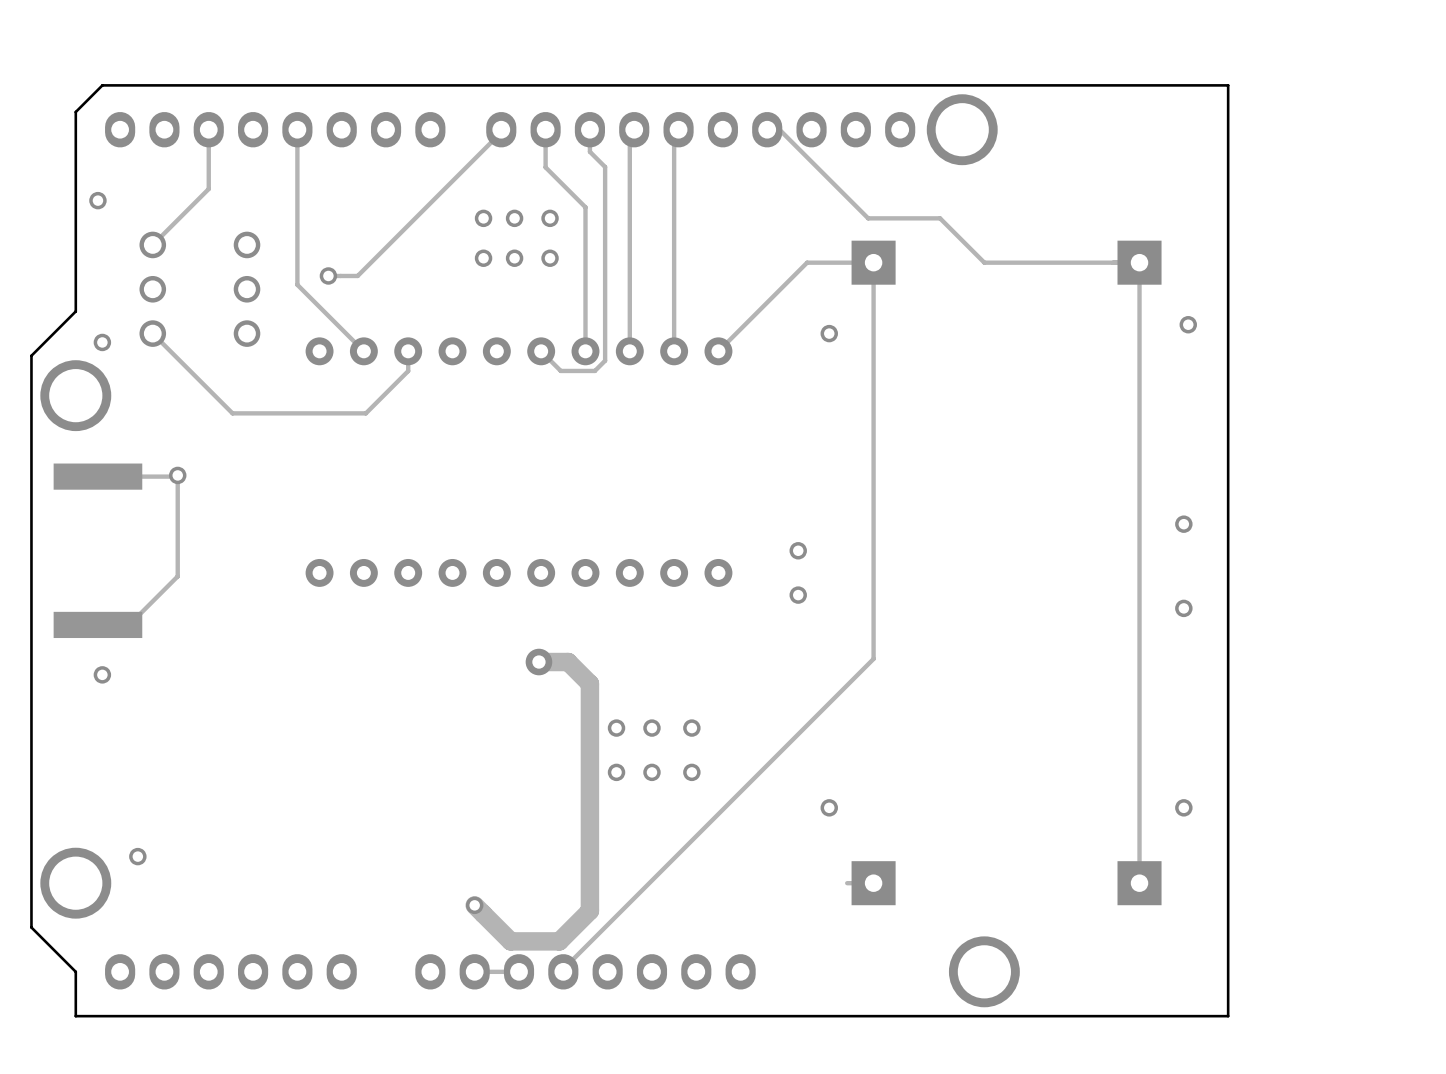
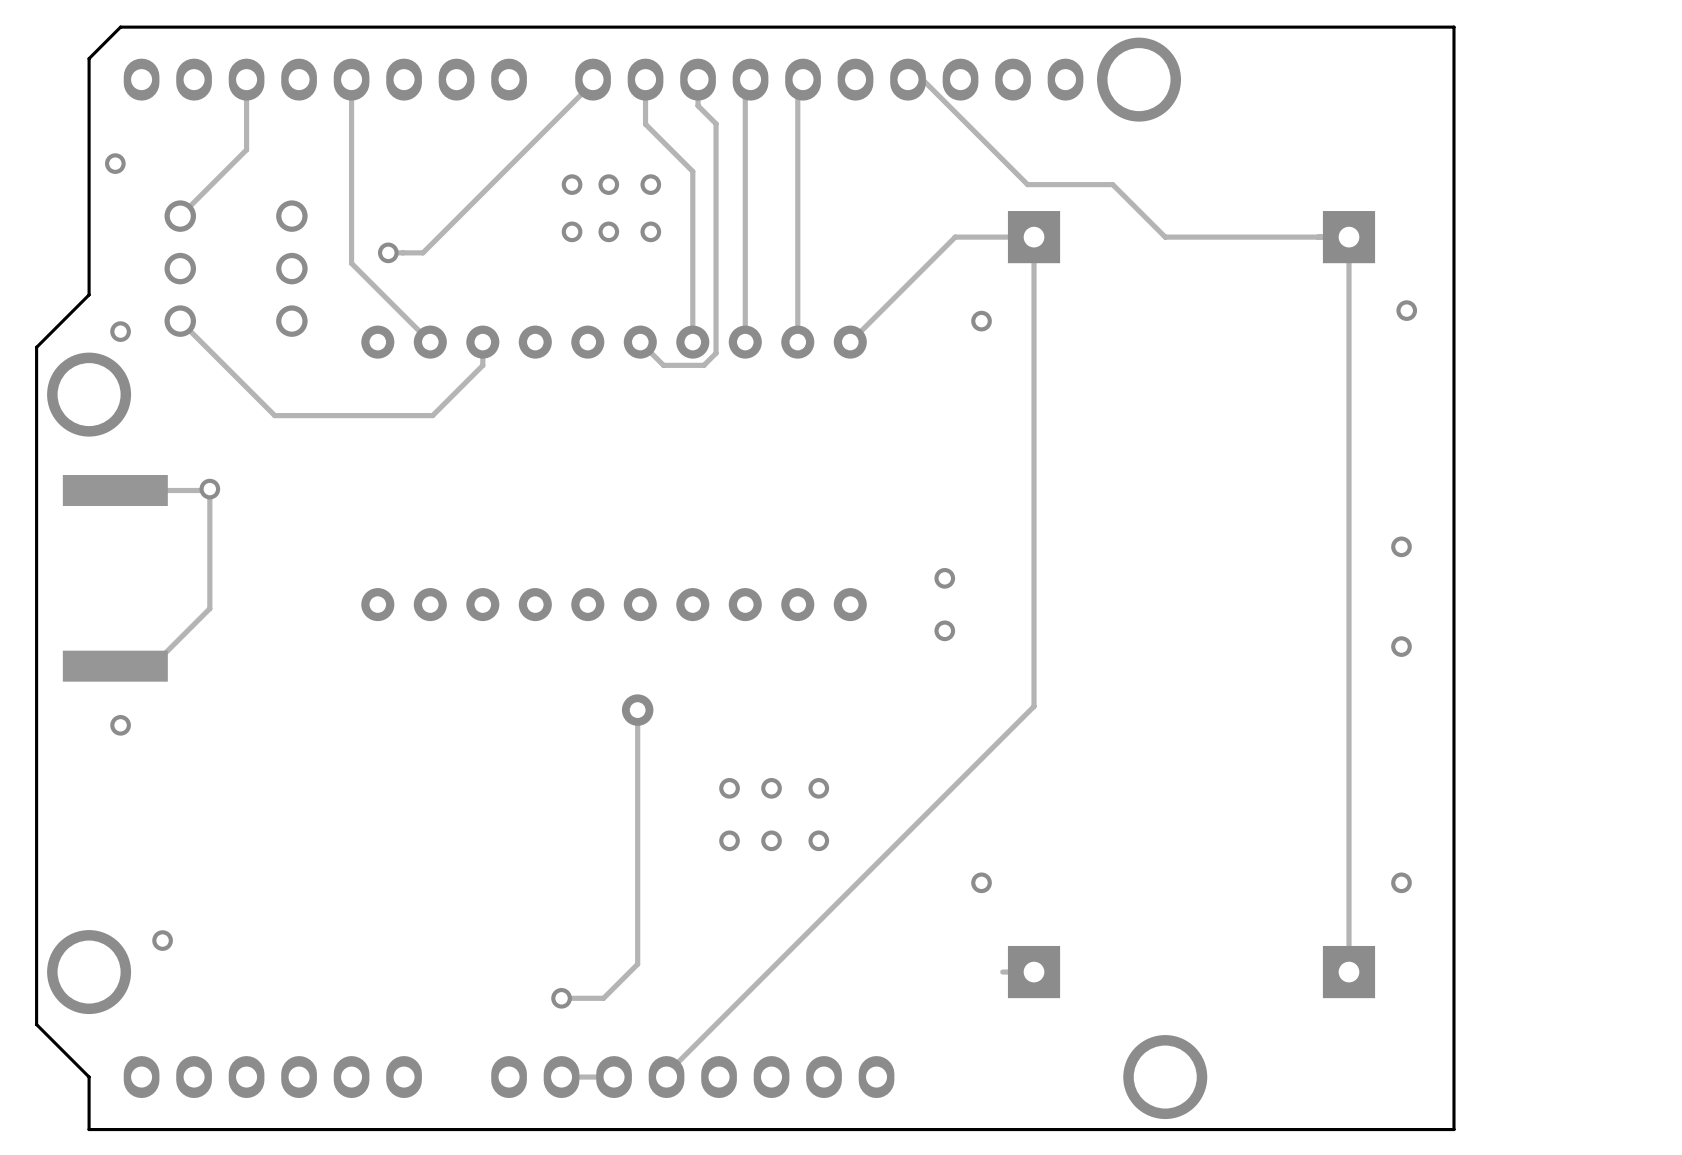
track: (538, 662) (568, 662) (589, 683) (589, 910) (559, 941) (510, 941) (474, 905) -> (637, 710) (637, 964) (603, 998) (561, 998)

